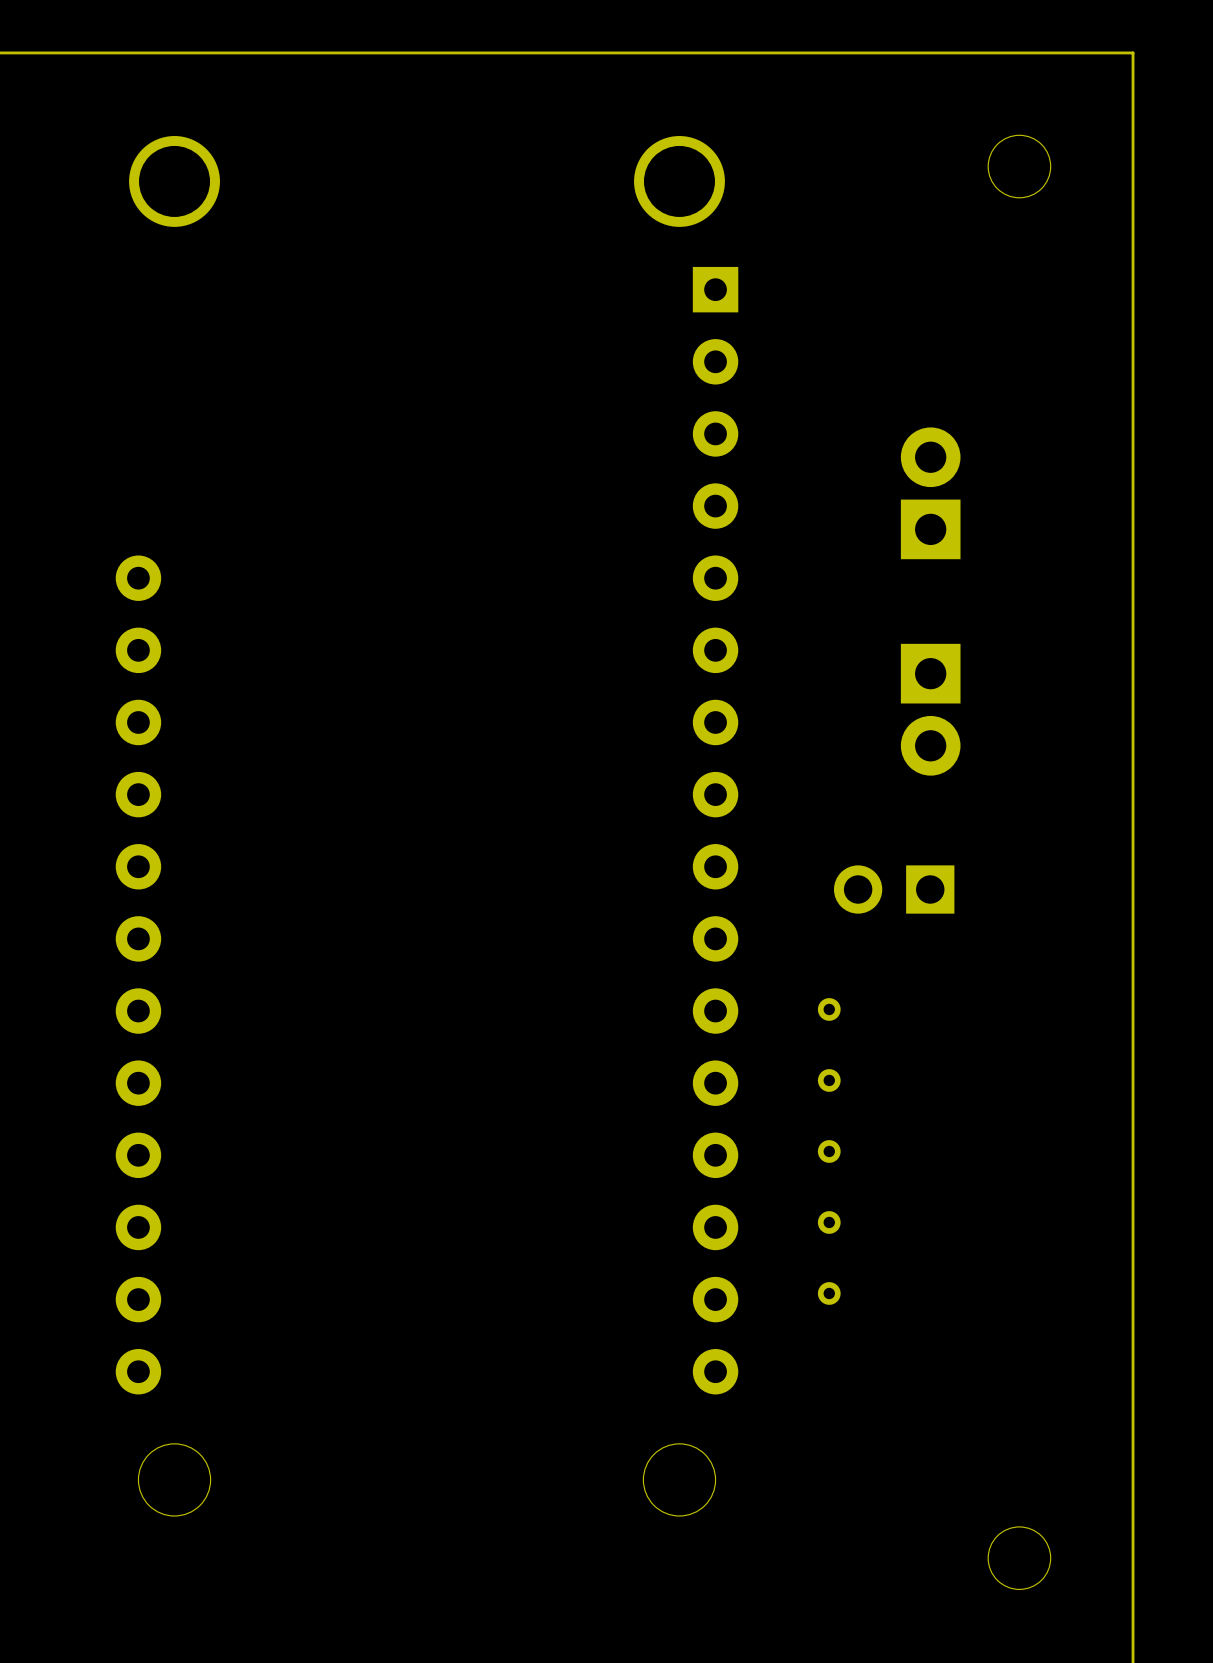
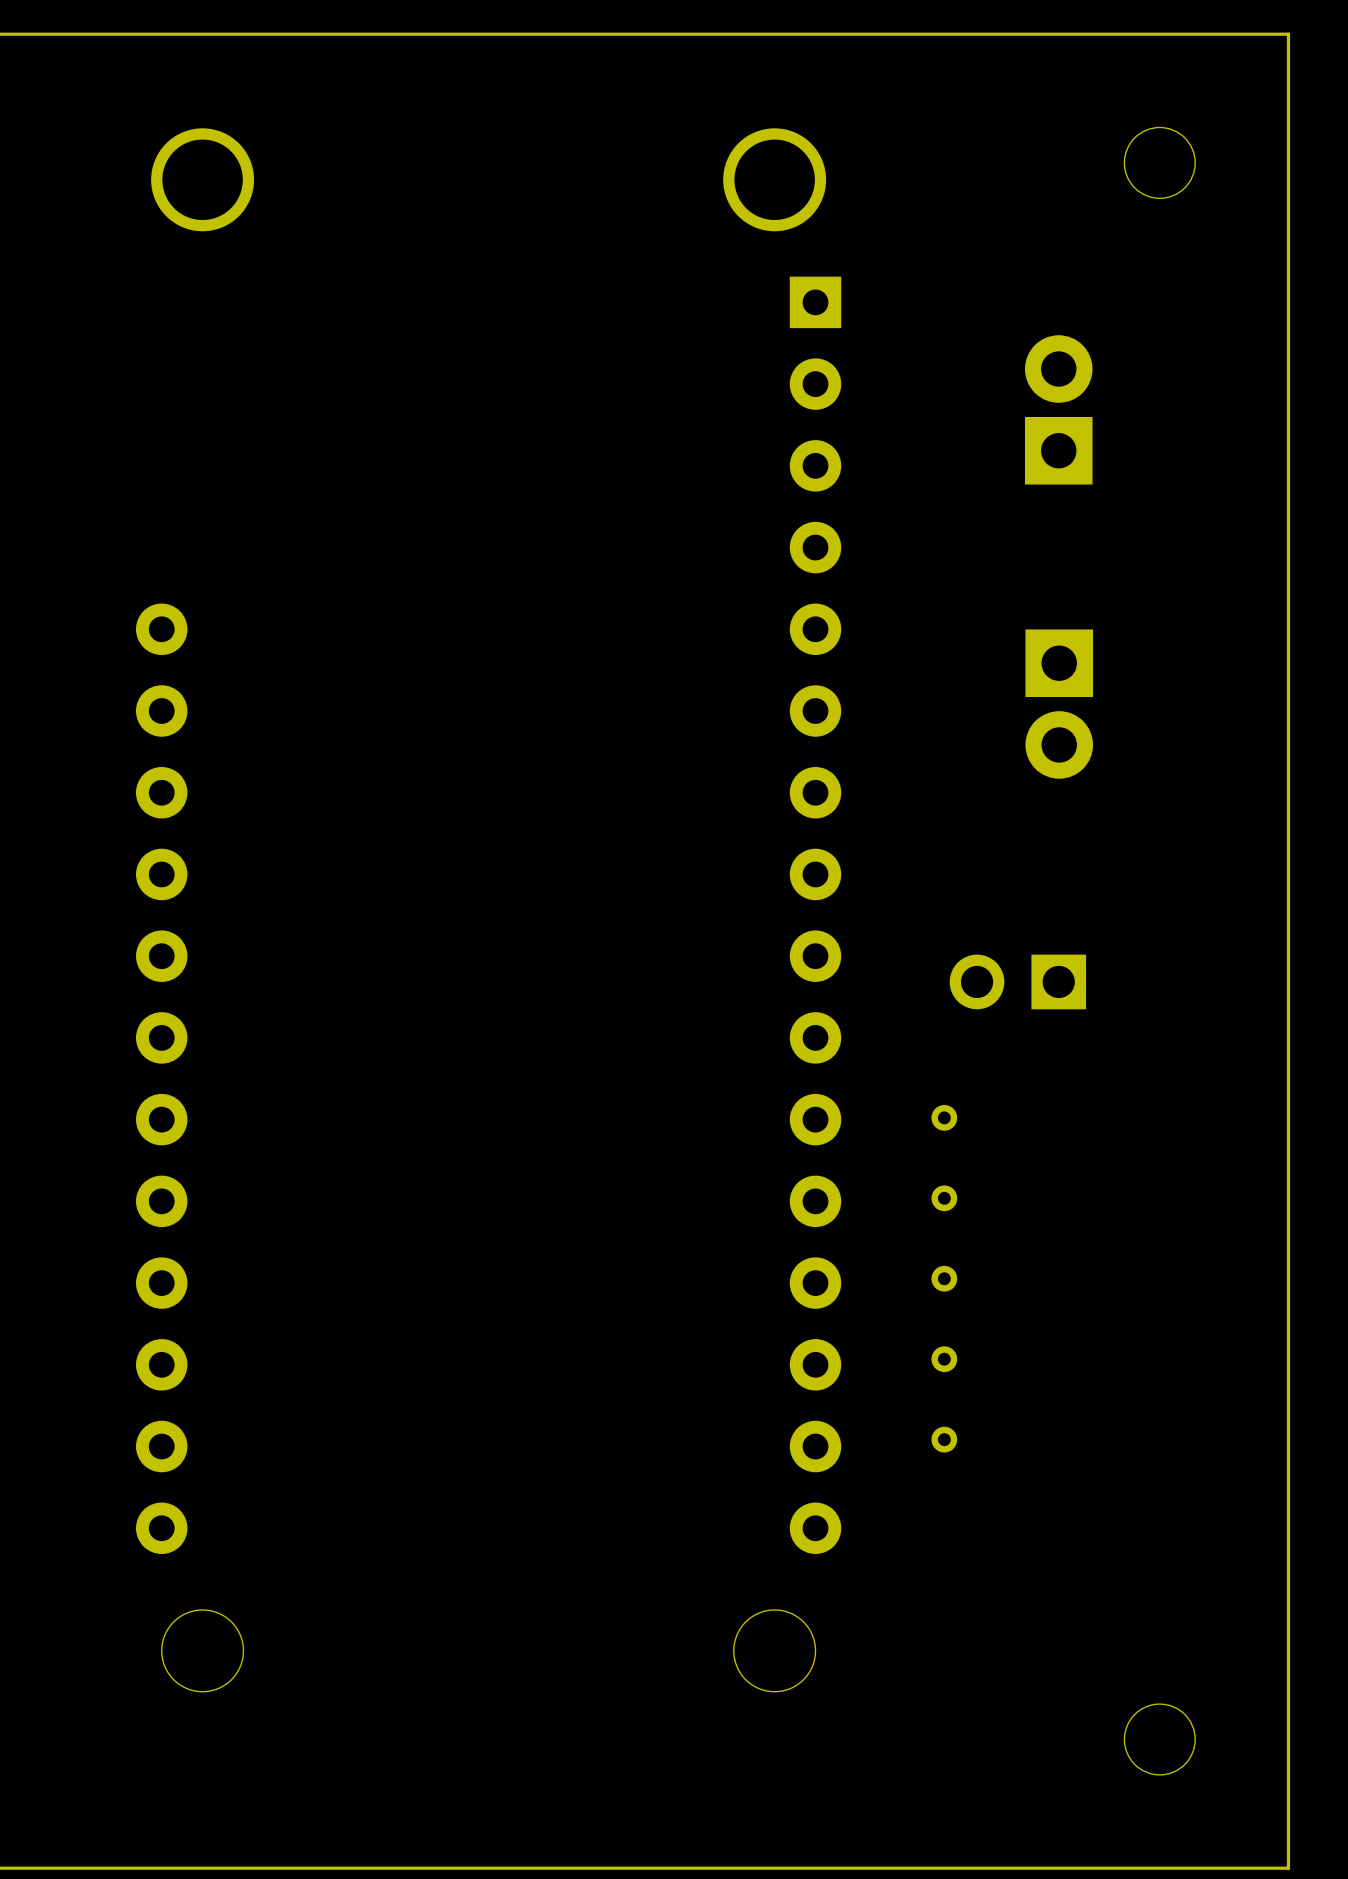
part: none -> (1058, 409)
part: (930, 493) -> none
part position: (930, 709) -> (1059, 704)

